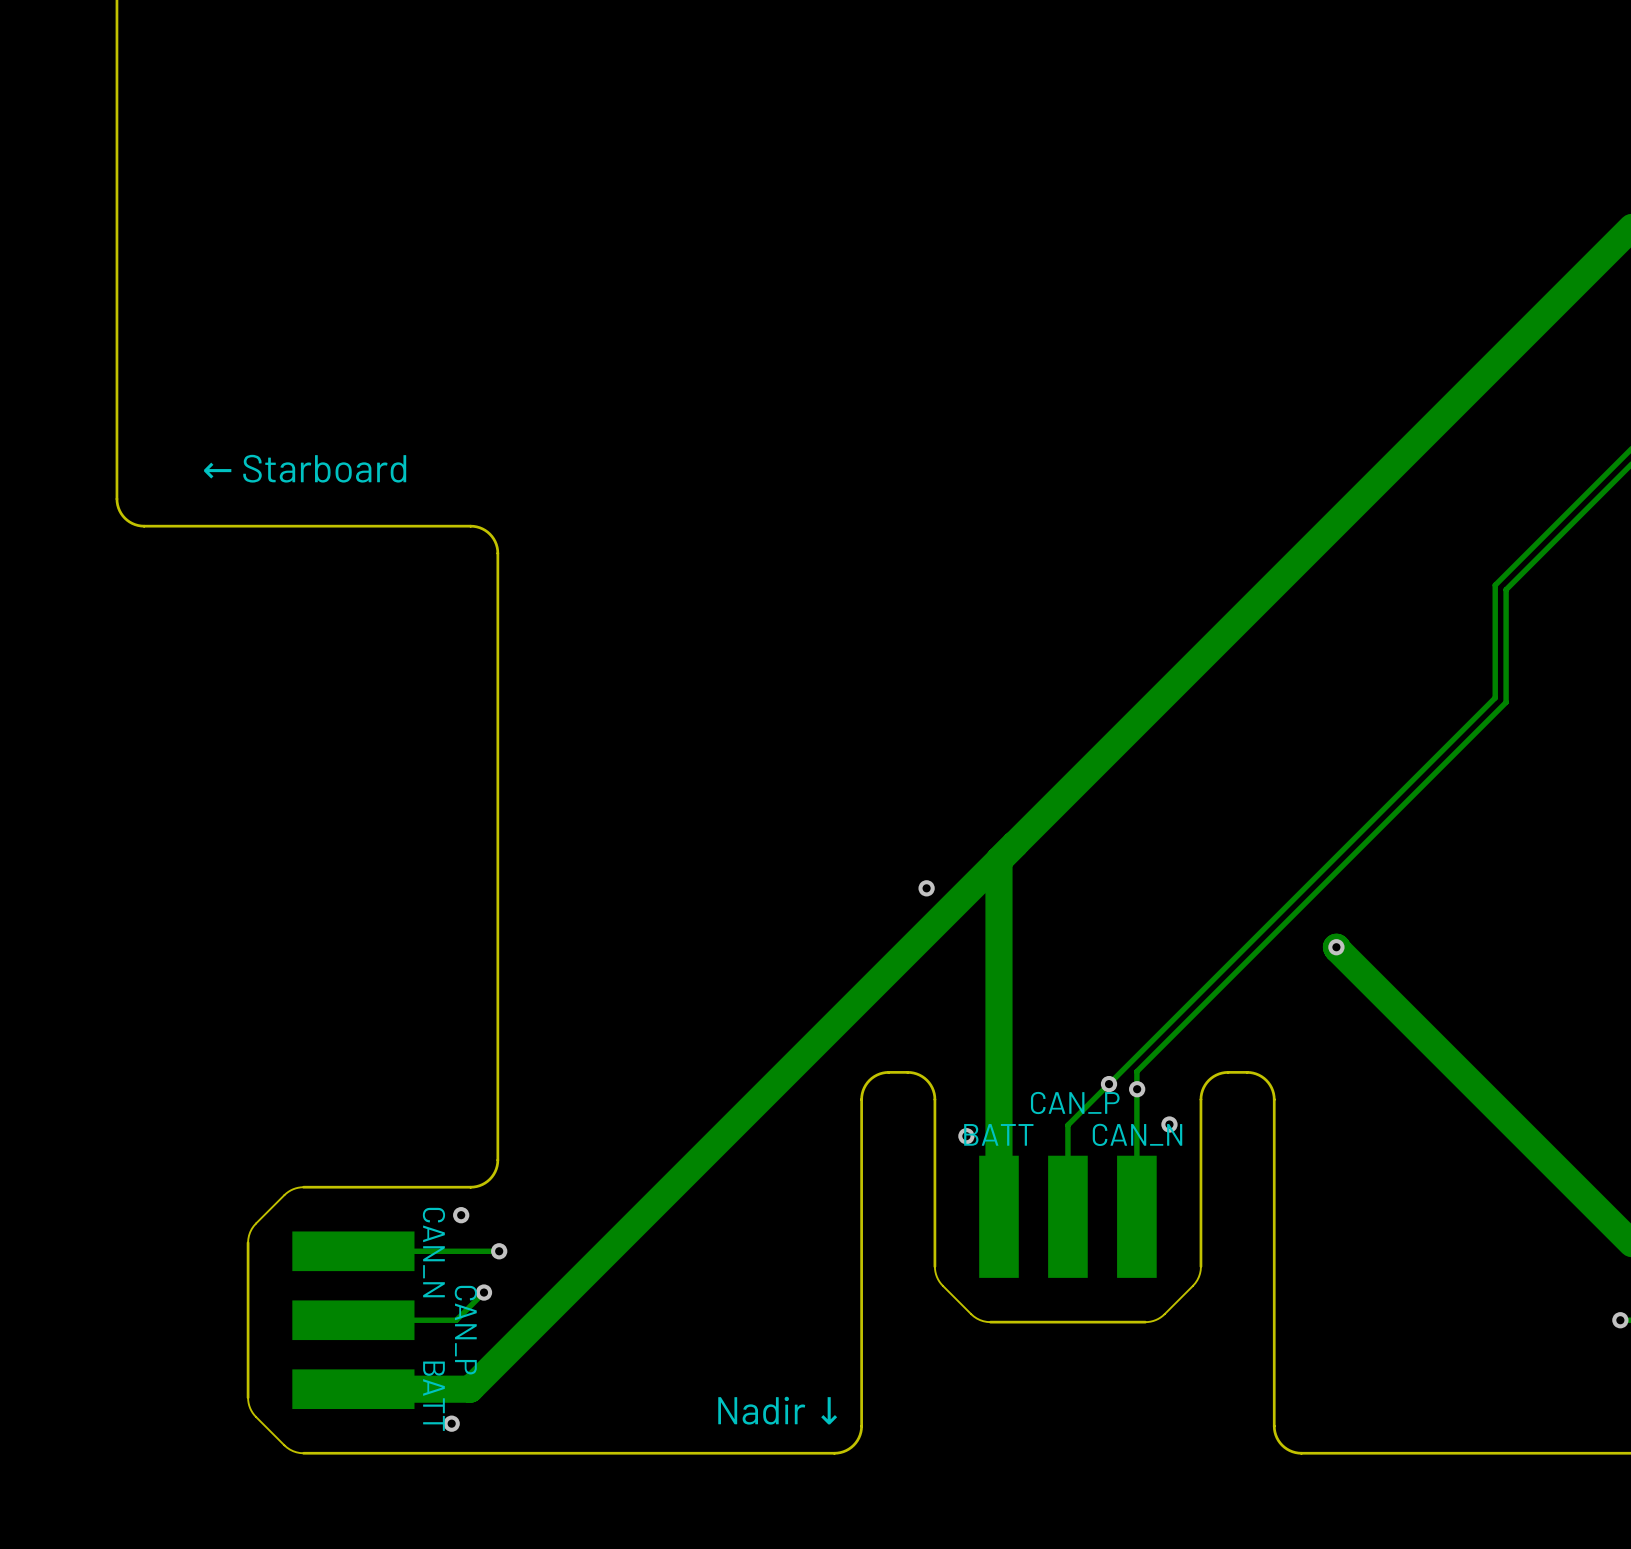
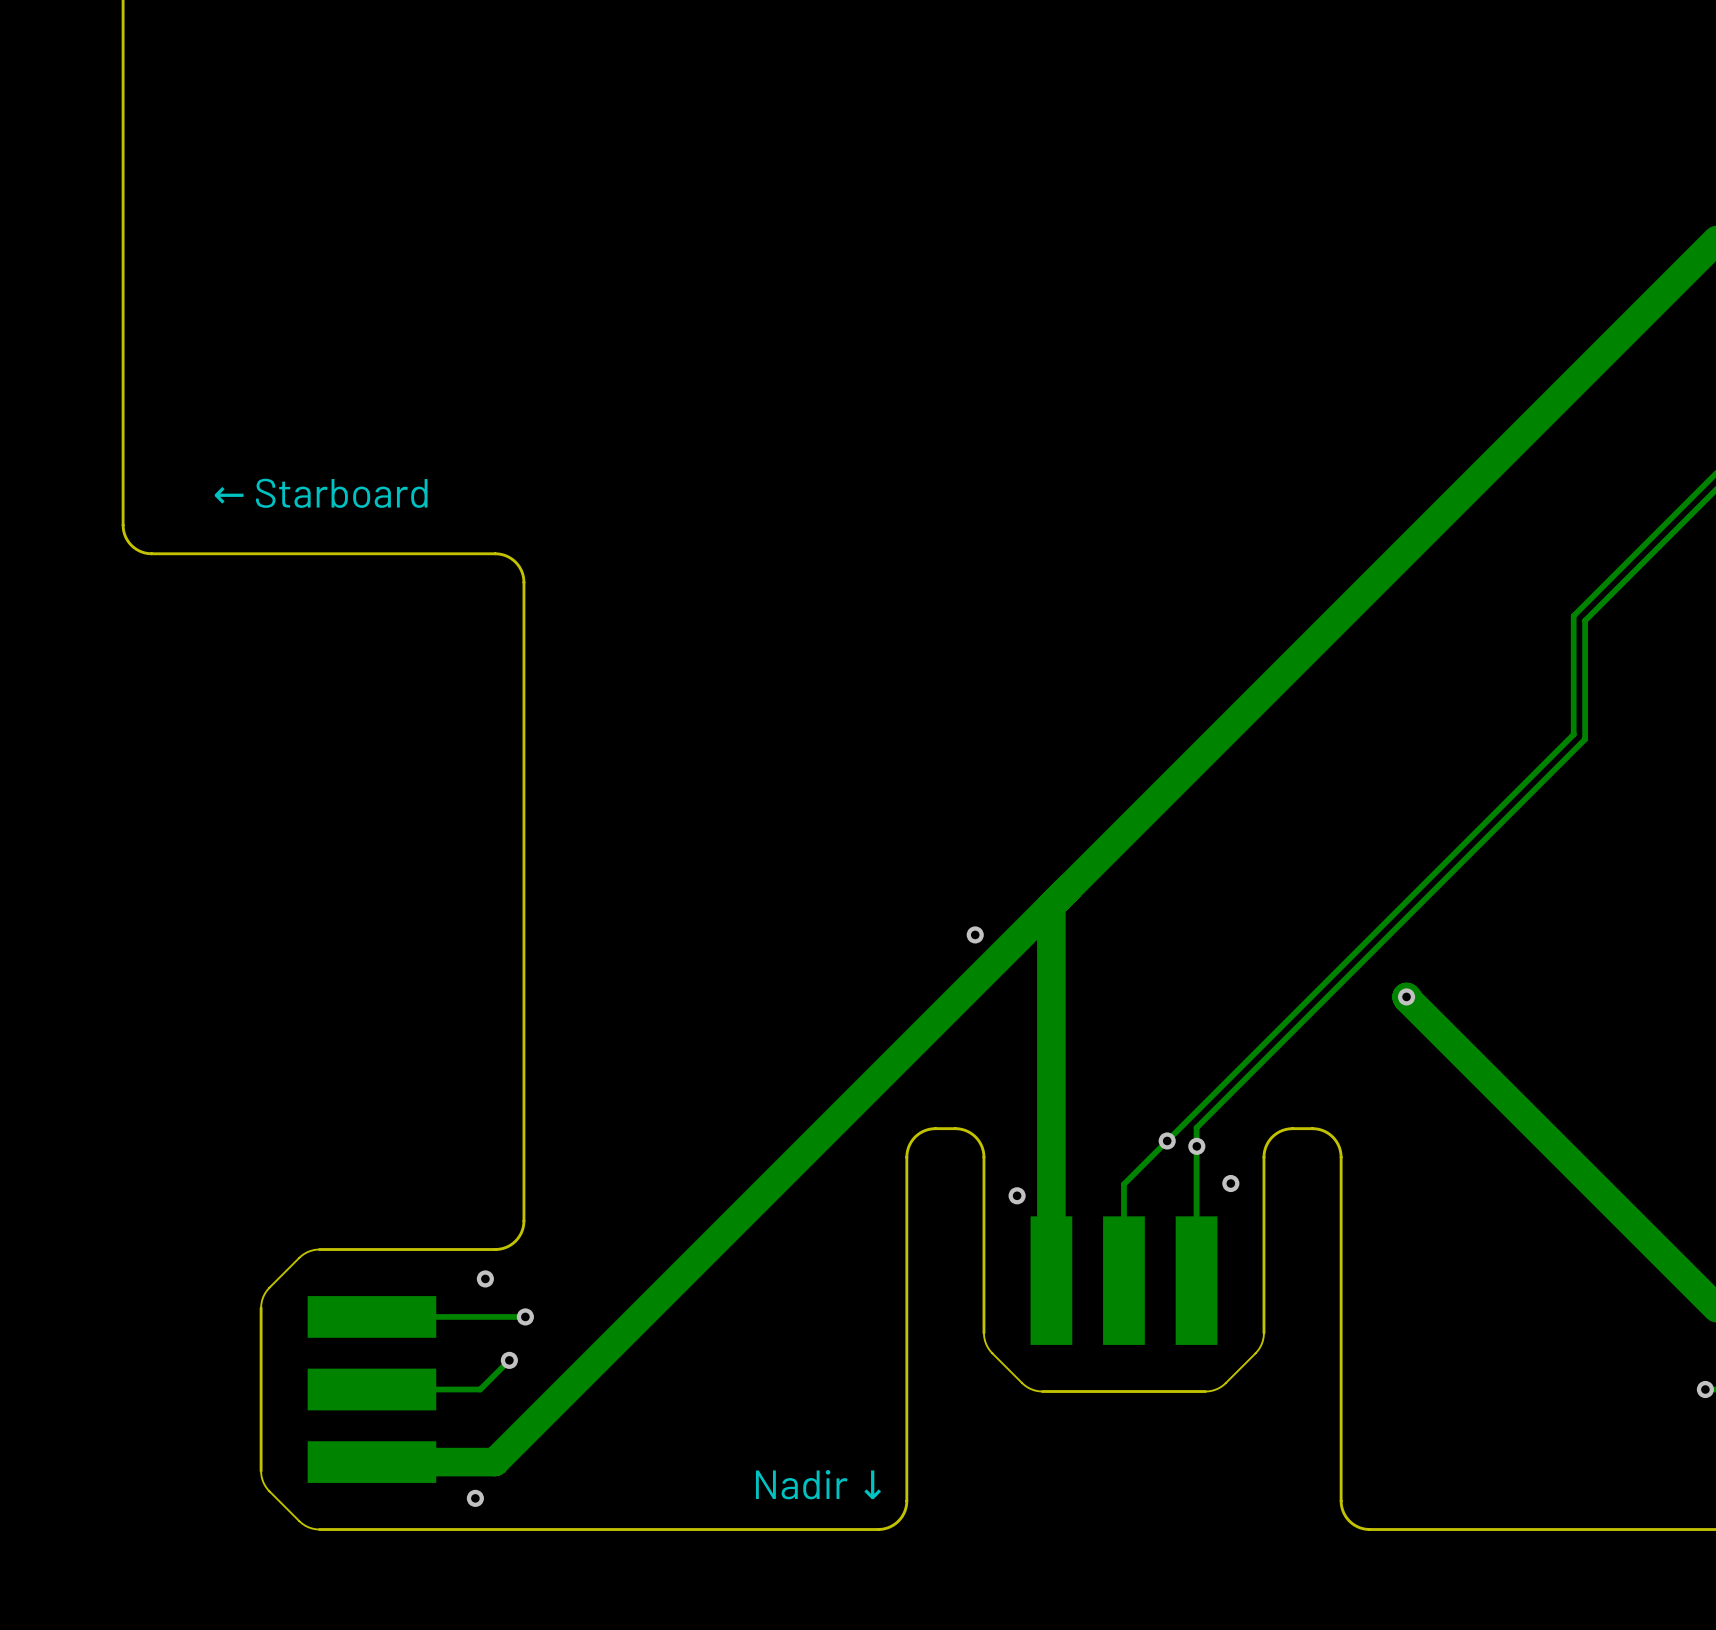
text: CAN_P (1075, 1102) -> none
text: BATT (998, 1134) -> none
text: CAN_N (1137, 1134) -> none
text: CAN_N (433, 1252) -> none
text: CAN_P (465, 1330) -> none
text: BATT (433, 1396) -> none

